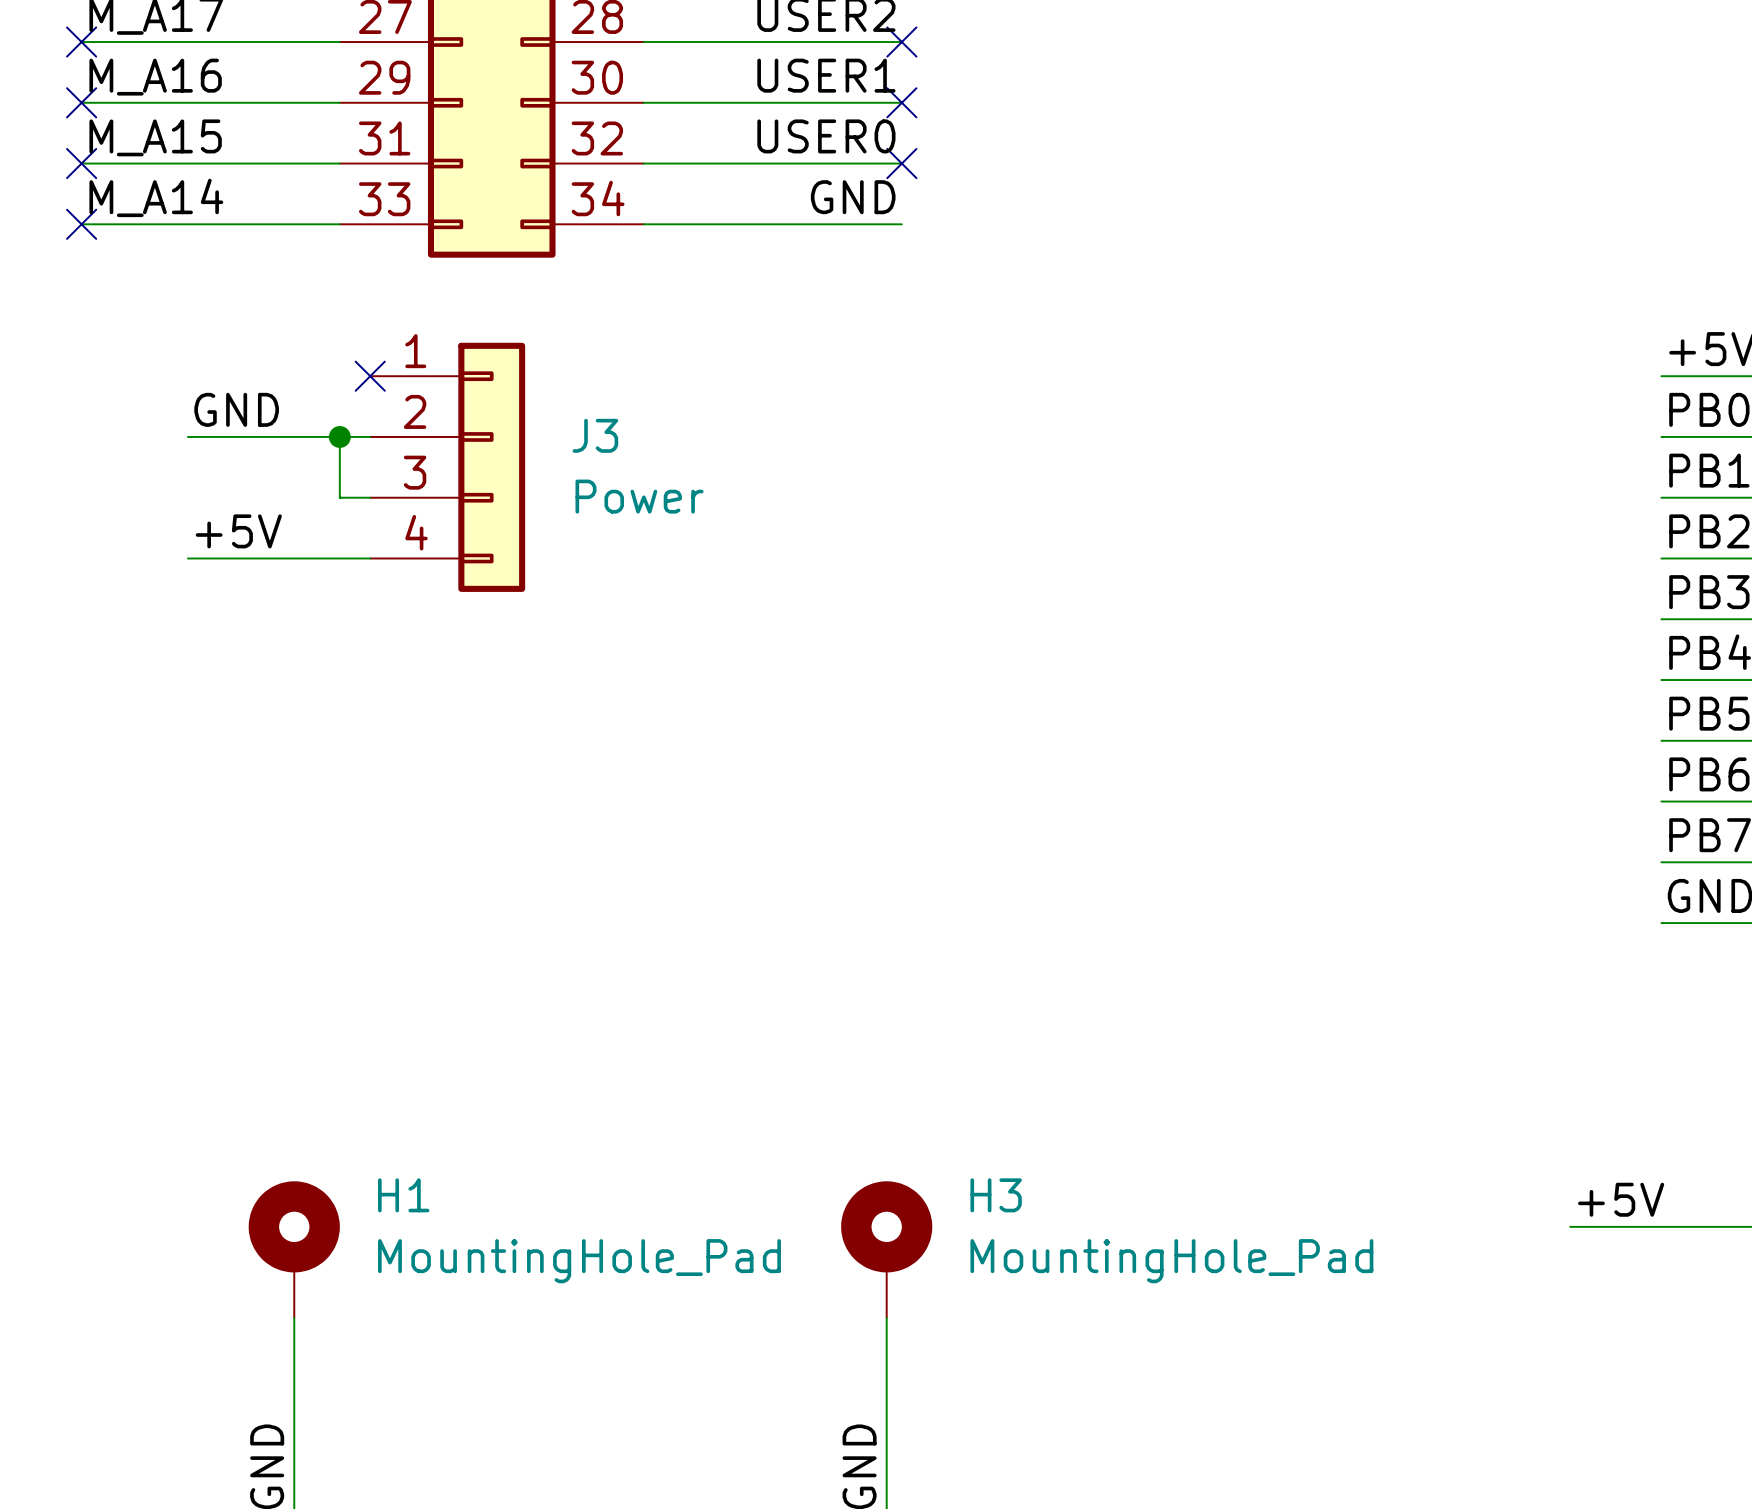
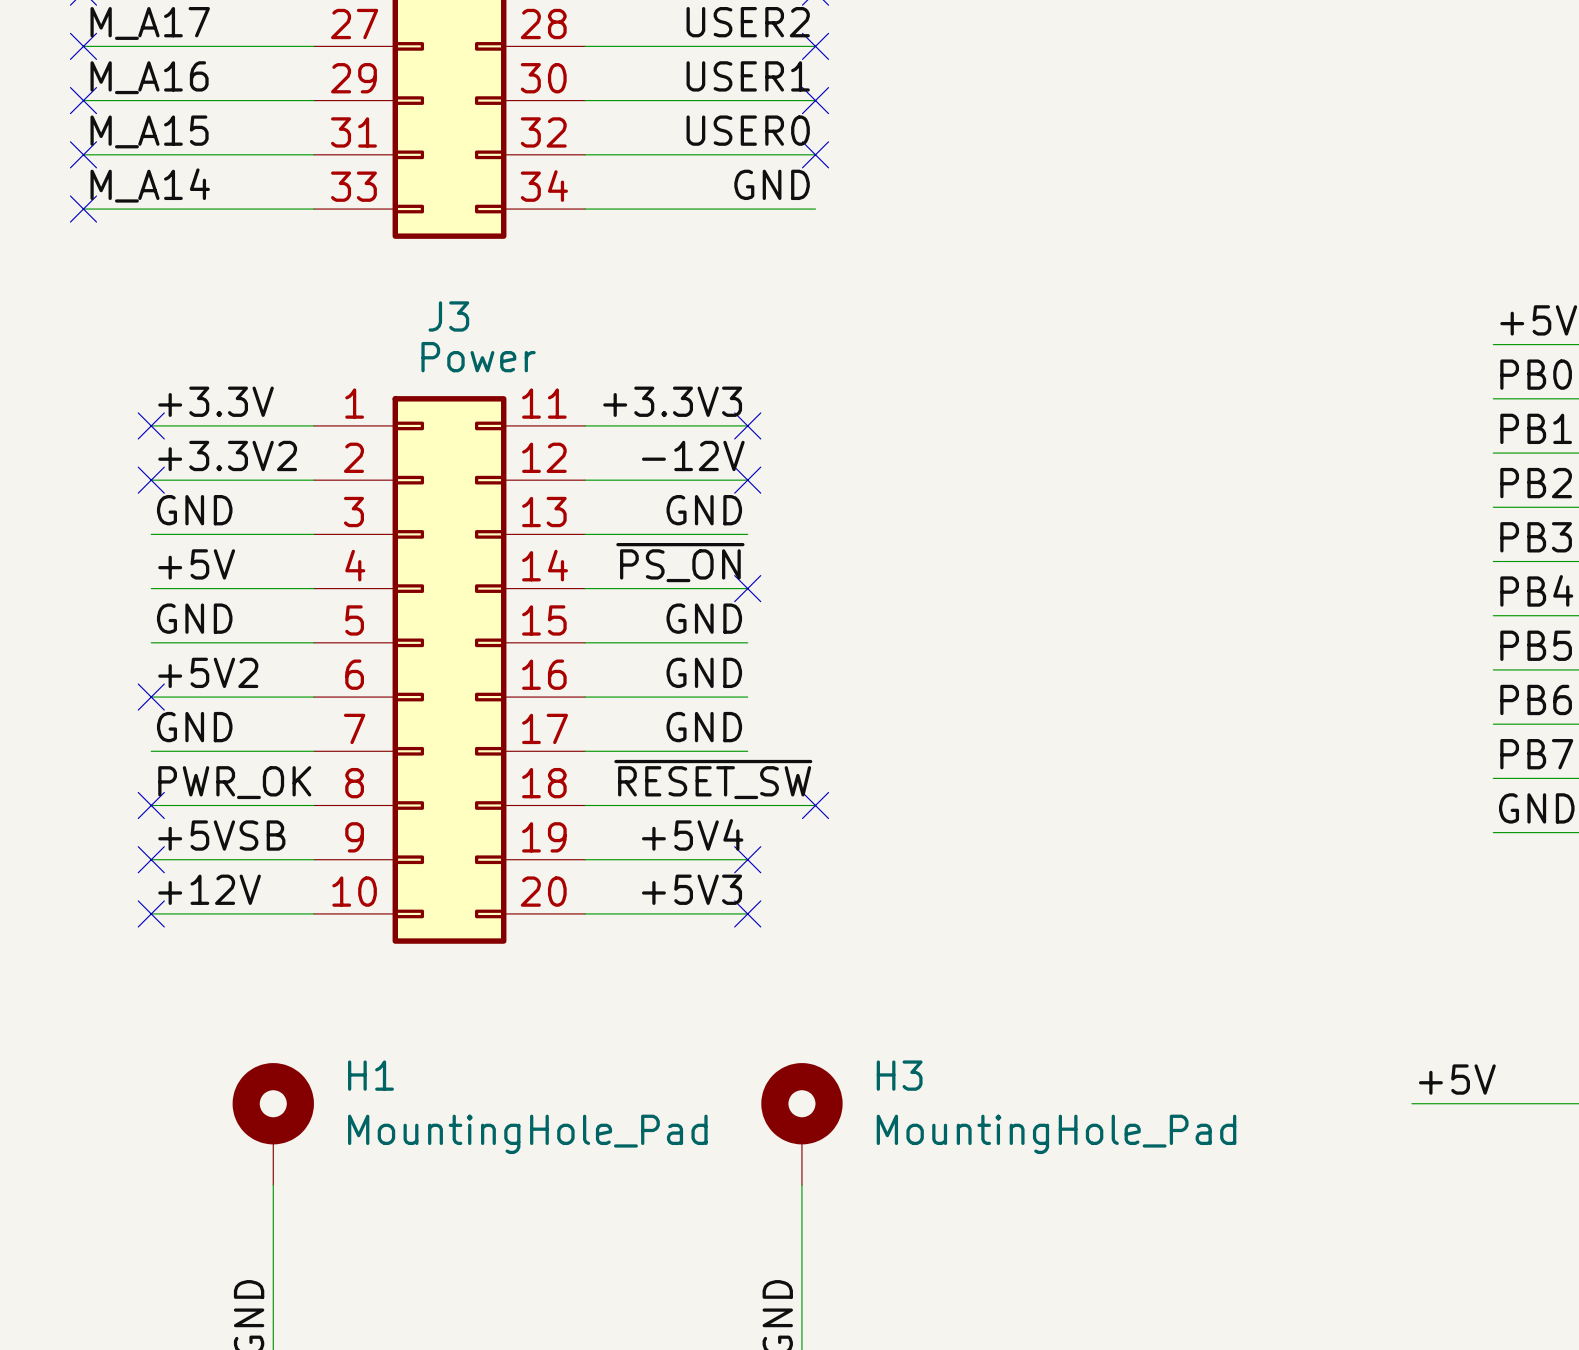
J3 symbol: [370, 342, 526, 592] -> [313, 396, 586, 944]
no-connect mark: (370, 376) -> none
label: GND (236, 409) -> none
J3 name position: J3 (595, 435) -> J3 (448, 316)
wire: (187, 436) (370, 436) -> (151, 425) (313, 425)
wire: (339, 436) (339, 497) (370, 497) -> none
junction: (339, 436) -> none
label: none -> +3.3V (216, 401)
label: none -> +3.3V3 (672, 401)
no-connect mark: none -> (151, 425)
wire: none -> (585, 425) (747, 425)
no-connect mark: none -> (747, 425)
J3 value position: Power (639, 496) -> Power (478, 357)
label: none -> +3.3V2 (227, 455)
label: none -> -12V (693, 455)
wire: none -> (151, 480) (313, 480)
no-connect mark: none -> (151, 480)
wire: none -> (585, 480) (747, 480)
no-connect mark: none -> (747, 480)
label position: +5V (238, 531) -> +5V (196, 564)
wire: (187, 558) (370, 558) -> (151, 534) (313, 534)
label: none -> GND (194, 510)
label: none -> GND (704, 510)
wire: none -> (585, 534) (747, 534)
label: none -> ~{PS_ON} (680, 562)
wire: none -> (151, 588) (313, 588)
wire: none -> (585, 588) (747, 588)
no-connect mark: none -> (747, 588)
label: none -> GND (194, 618)
label: none -> GND (704, 618)
wire: none -> (151, 642) (313, 642)
wire: none -> (585, 642) (747, 642)
label: none -> +5V2 (208, 672)
label: none -> GND (704, 672)
wire: none -> (151, 697) (313, 697)
no-connect mark: none -> (151, 697)
wire: none -> (585, 697) (747, 697)
label: none -> GND (194, 727)
label: none -> GND (704, 727)
wire: none -> (151, 751) (313, 751)
wire: none -> (585, 751) (747, 751)
label: none -> ~{RESET_SW} (713, 779)
label: none -> PWR_OK (234, 782)
wire: none -> (151, 805) (313, 805)
no-connect mark: none -> (151, 805)
wire: none -> (585, 805) (815, 805)
no-connect mark: none -> (815, 805)
label: none -> +5V4 (692, 834)
label: none -> +5VSB (221, 835)
wire: none -> (151, 859) (313, 859)
no-connect mark: none -> (151, 859)
wire: none -> (585, 859) (747, 859)
no-connect mark: none -> (747, 859)
label: none -> +12V (209, 889)
label: none -> +5V3 (692, 889)
wire: none -> (151, 913) (313, 913)
no-connect mark: none -> (151, 913)
wire: none -> (585, 913) (747, 913)
no-connect mark: none -> (747, 913)

